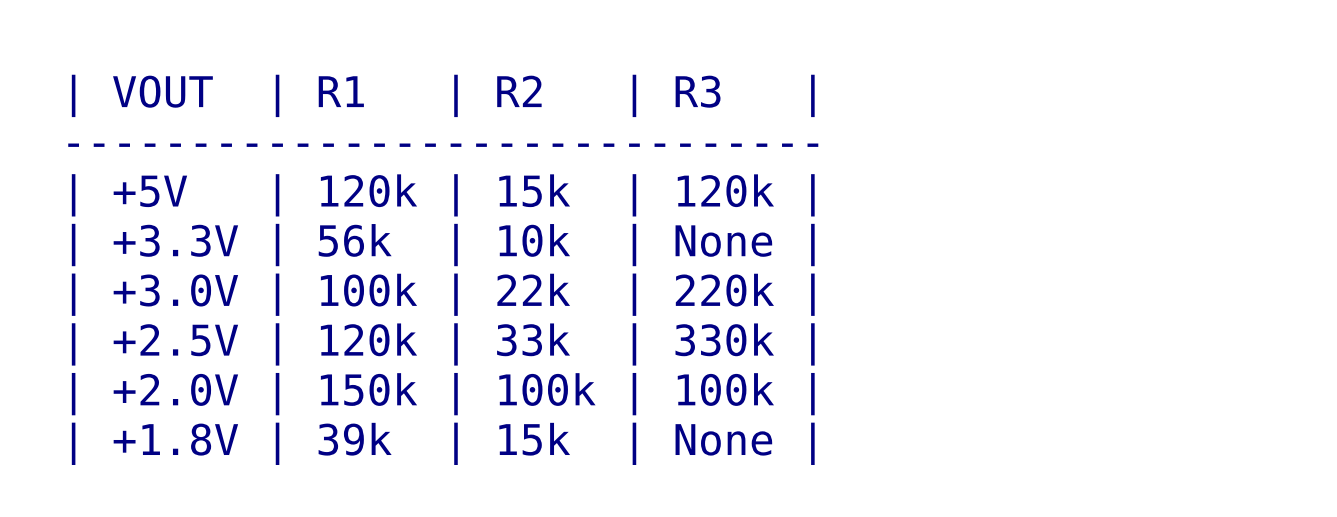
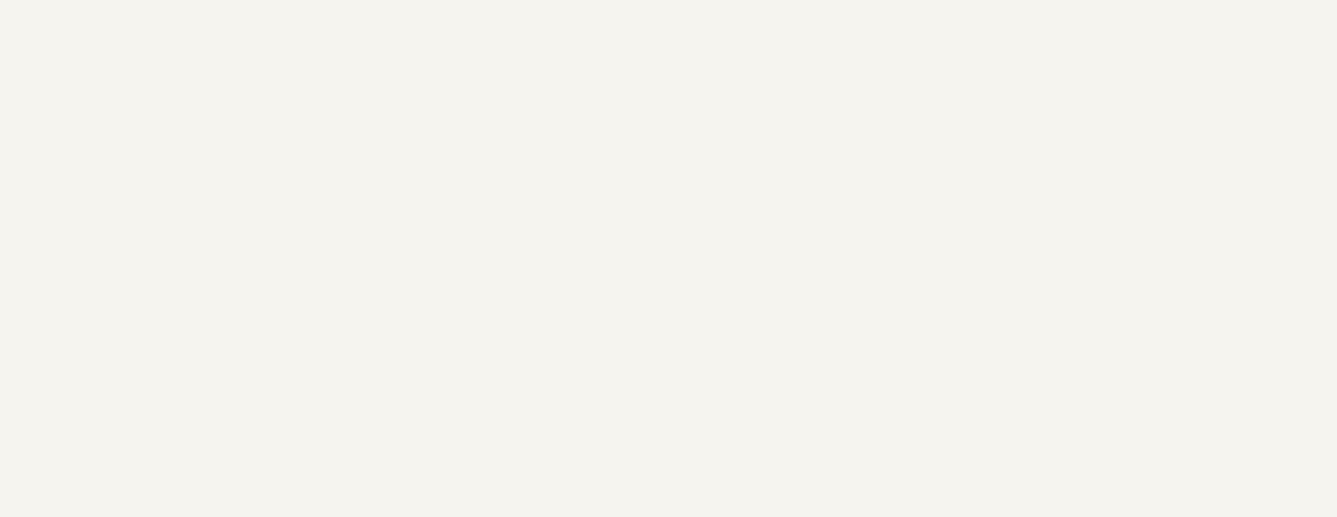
text: | VOUT | R1 | R2 | R3 | (443, 95) -> none
text: ------------------------------ (443, 145) -> none
text: | +5V | 120k | 15k | 120k | (443, 195) -> none
text: | +3.3V | 56k | 10k | None | (443, 245) -> none
text: | +3.0V | 100k | 22k | 220k | (443, 294) -> none
text: | +2.5V | 120k | 33k | 330k | (443, 344) -> none
text: | +2.0V | 150k | 100k | 100k | (443, 394) -> none
text: | +1.8V | 39k | 15k | None | (443, 443) -> none

